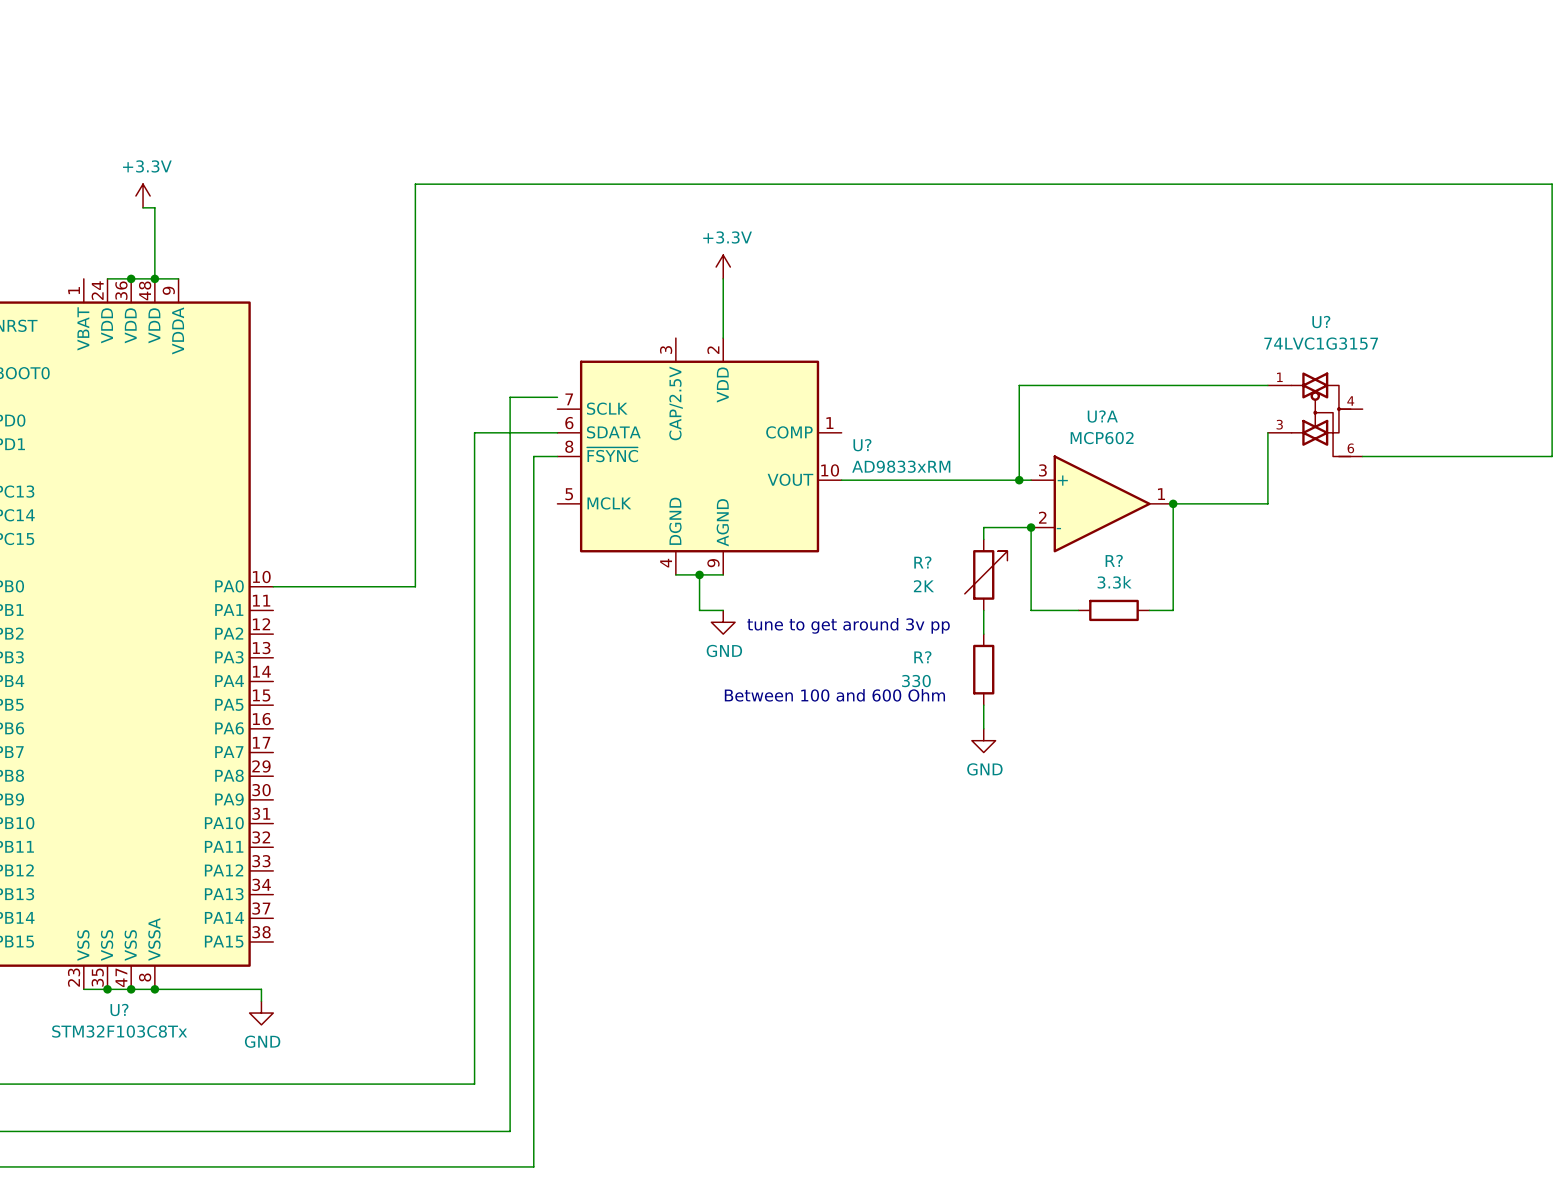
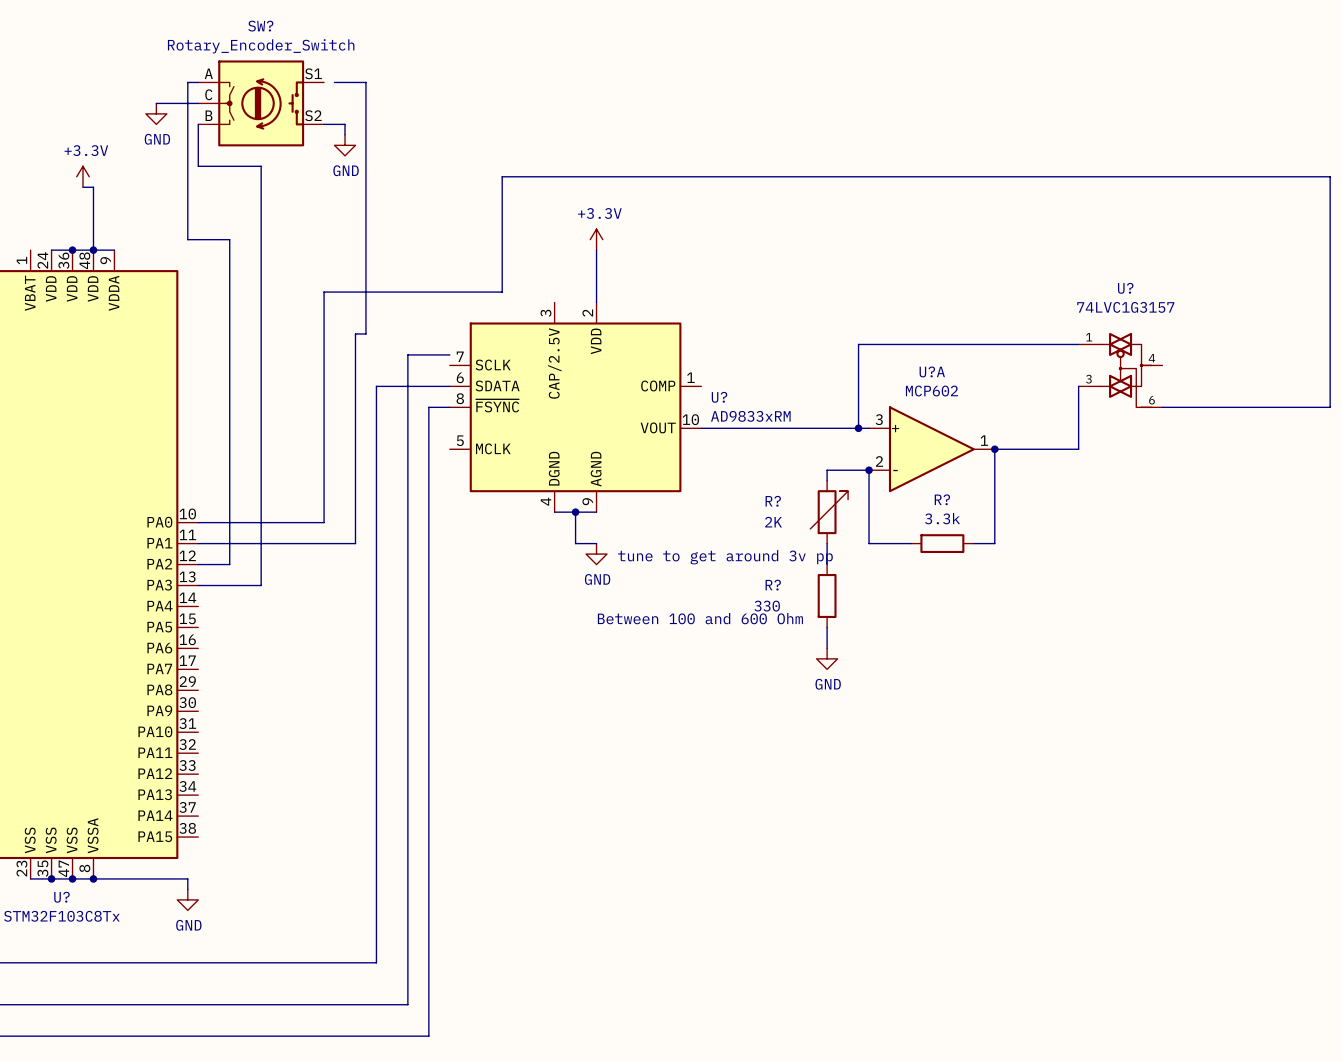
wire: none -> (198, 82) (187, 82) (187, 239) (229, 239) (229, 564) (198, 564)
wire: none -> (334, 82) (365, 82) (365, 333) (355, 333) (355, 543) (198, 543)
wire: none -> (156, 103) (198, 103)
SW?: none -> Rotary_Encoder_Switch (261, 103)
power symbol: none -> GND (156, 113)
wire: none -> (198, 124) (198, 166) (261, 166) (261, 585) (198, 585)
wire: none -> (324, 124) (345, 124) (345, 134)
power symbol: none -> GND (345, 145)
wire: (1552, 196) (1552, 184) (415, 184) (415, 326) -> (1330, 176) (502, 176) (502, 292) (324, 292)

